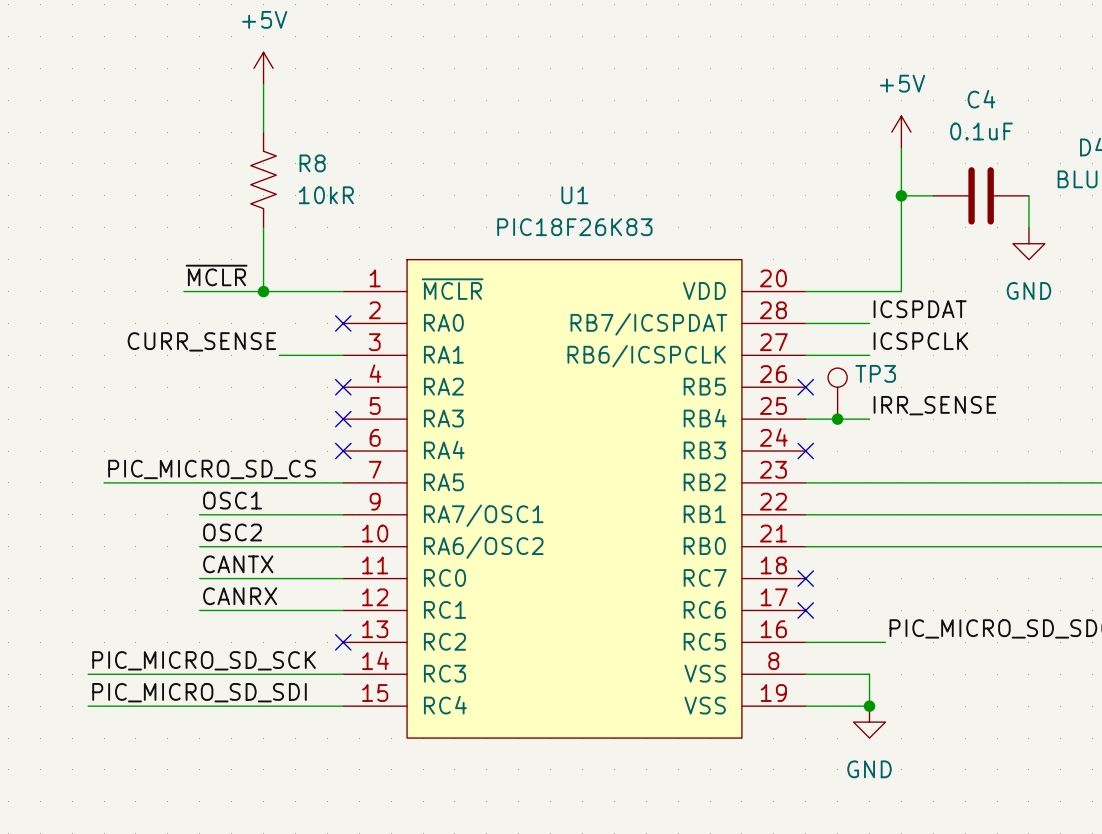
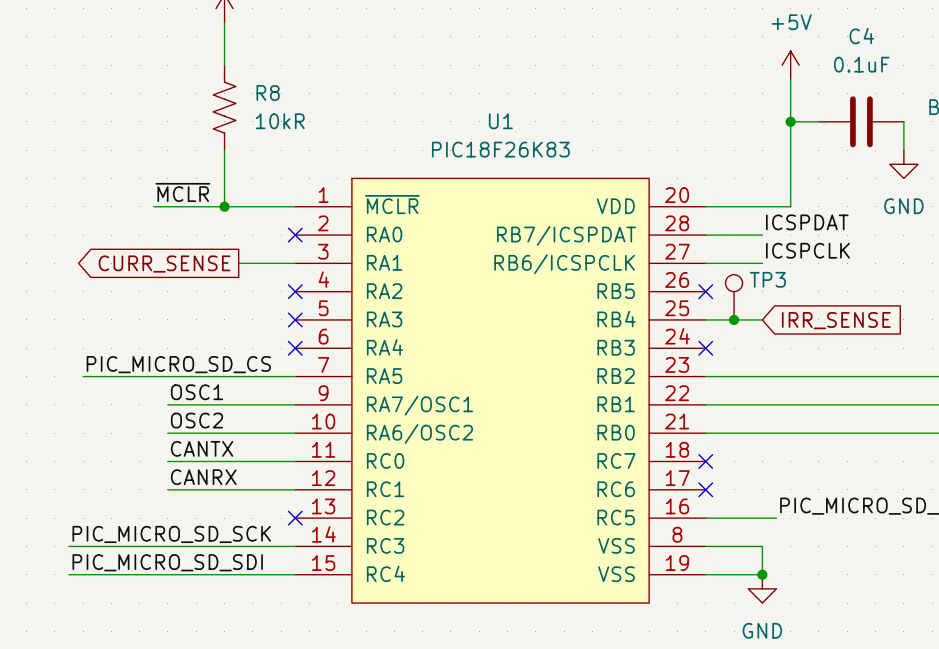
label: CURR_SENSE (201, 341) -> none
global label: none -> CURR_SENSE (164, 264)
label: IRR_SENSE (934, 405) -> none
global label: none -> IRR_SENSE (836, 320)

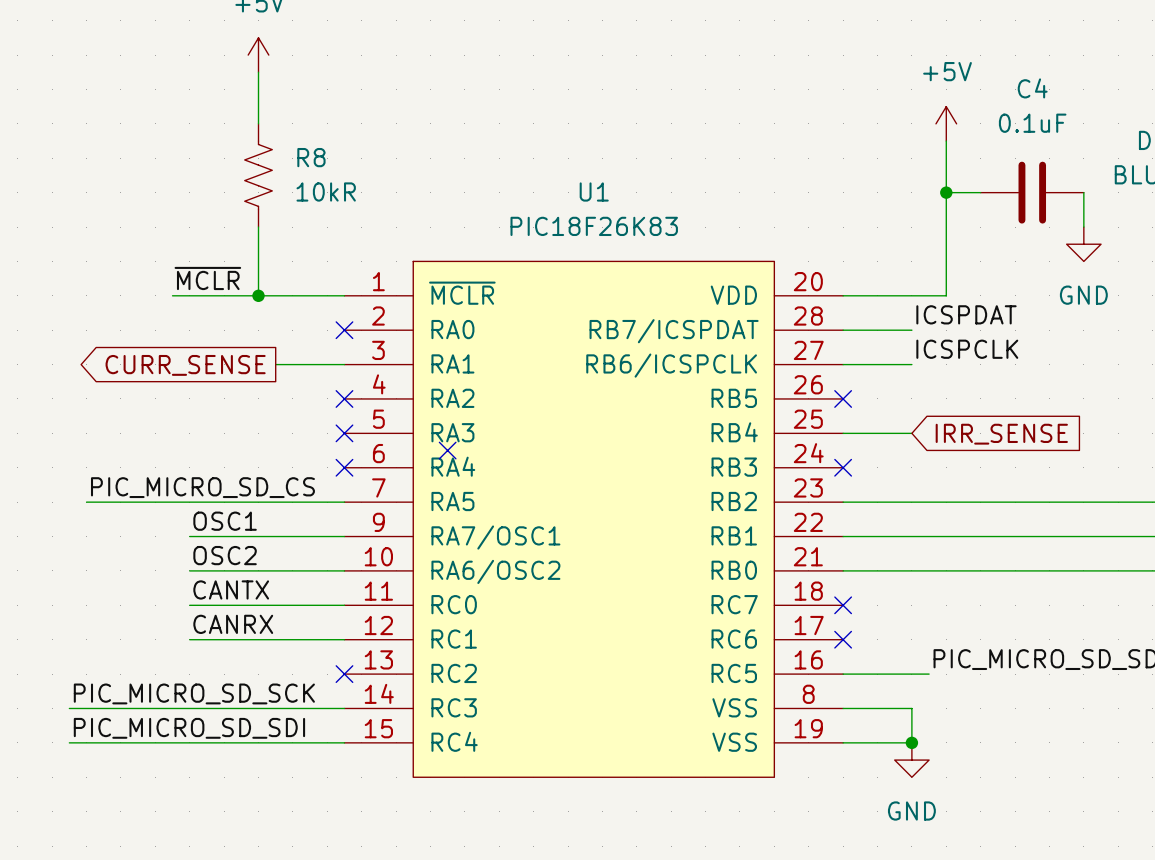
TP3: (734, 297) -> none
junction: (734, 319) -> none
no-connect mark: none -> (447, 450)

